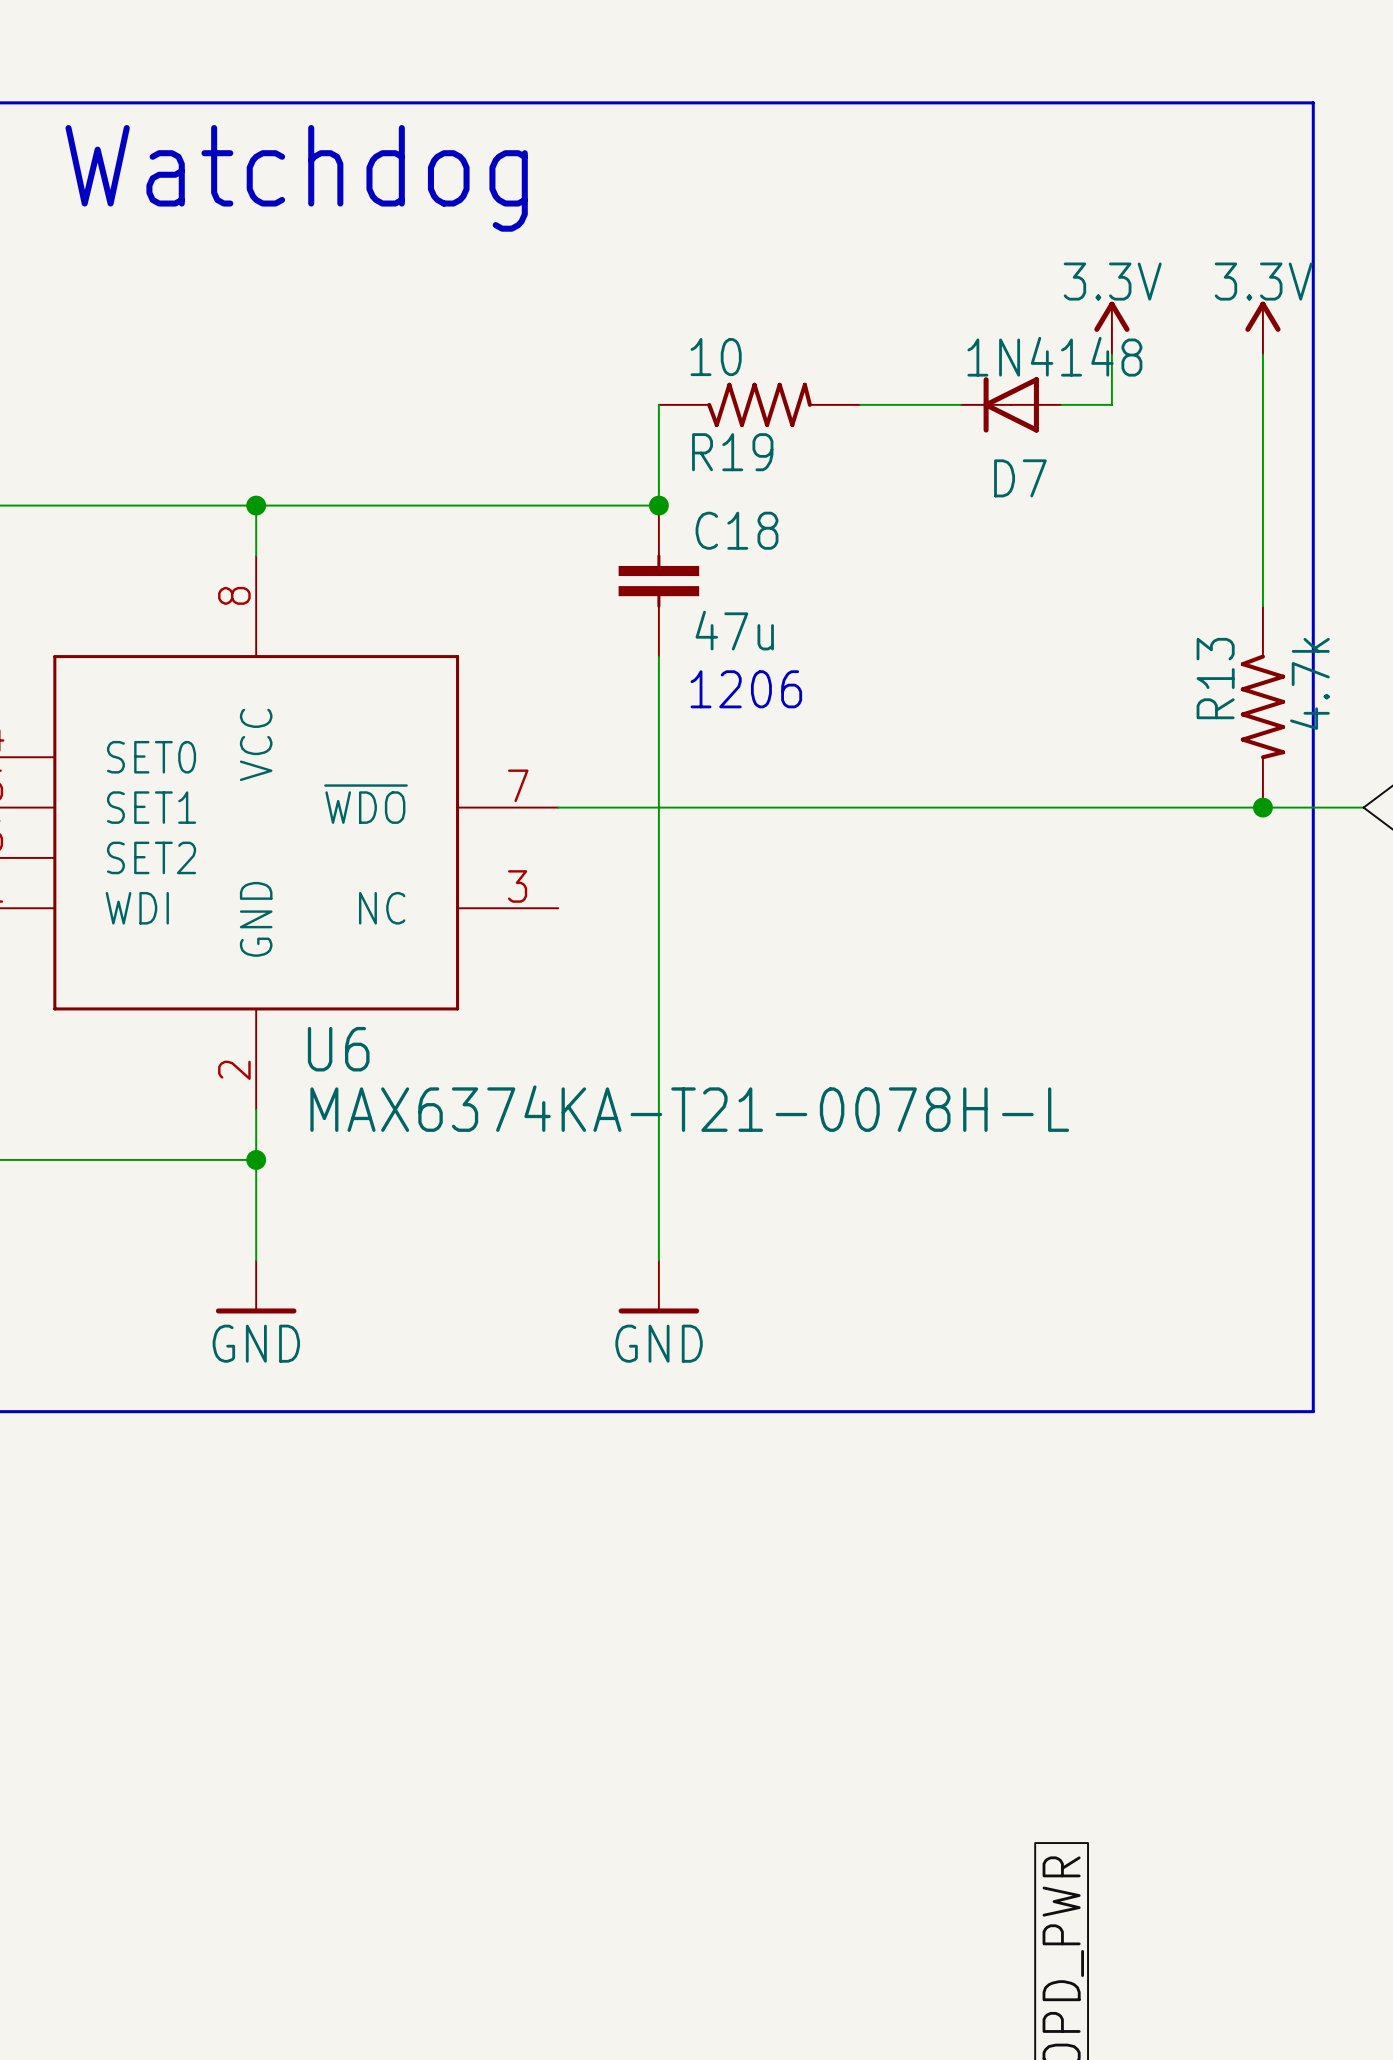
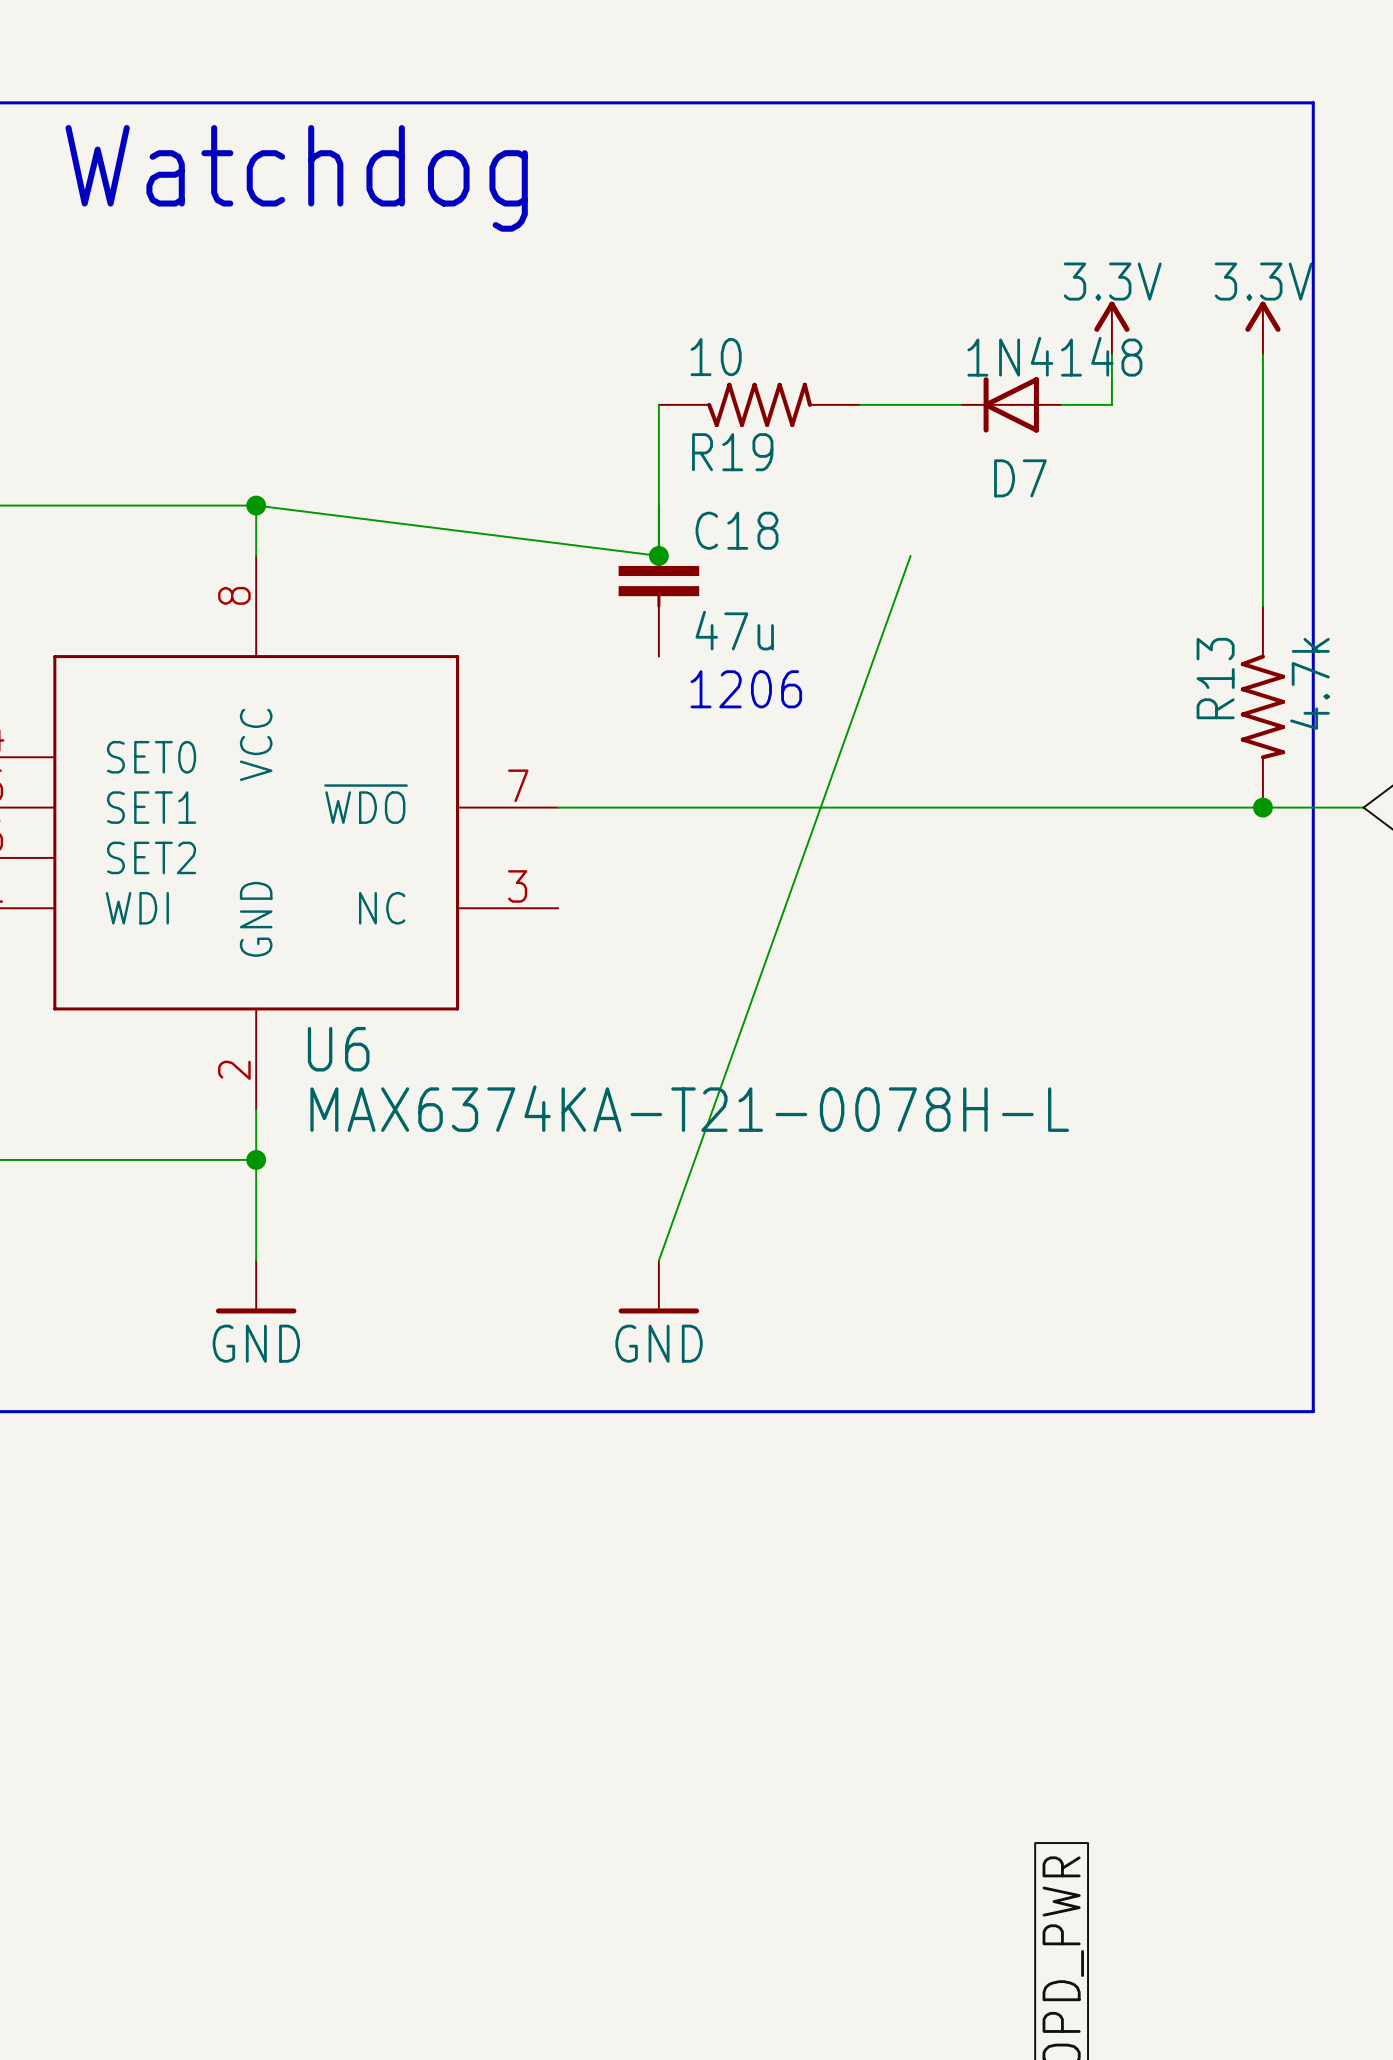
wire: (256, 505) (658, 505) -> (256, 505) (658, 555) (658, 505)
junction position: (658, 505) -> (658, 555)
wire: (658, 656) (658, 1260) -> (910, 555) (658, 1260)

